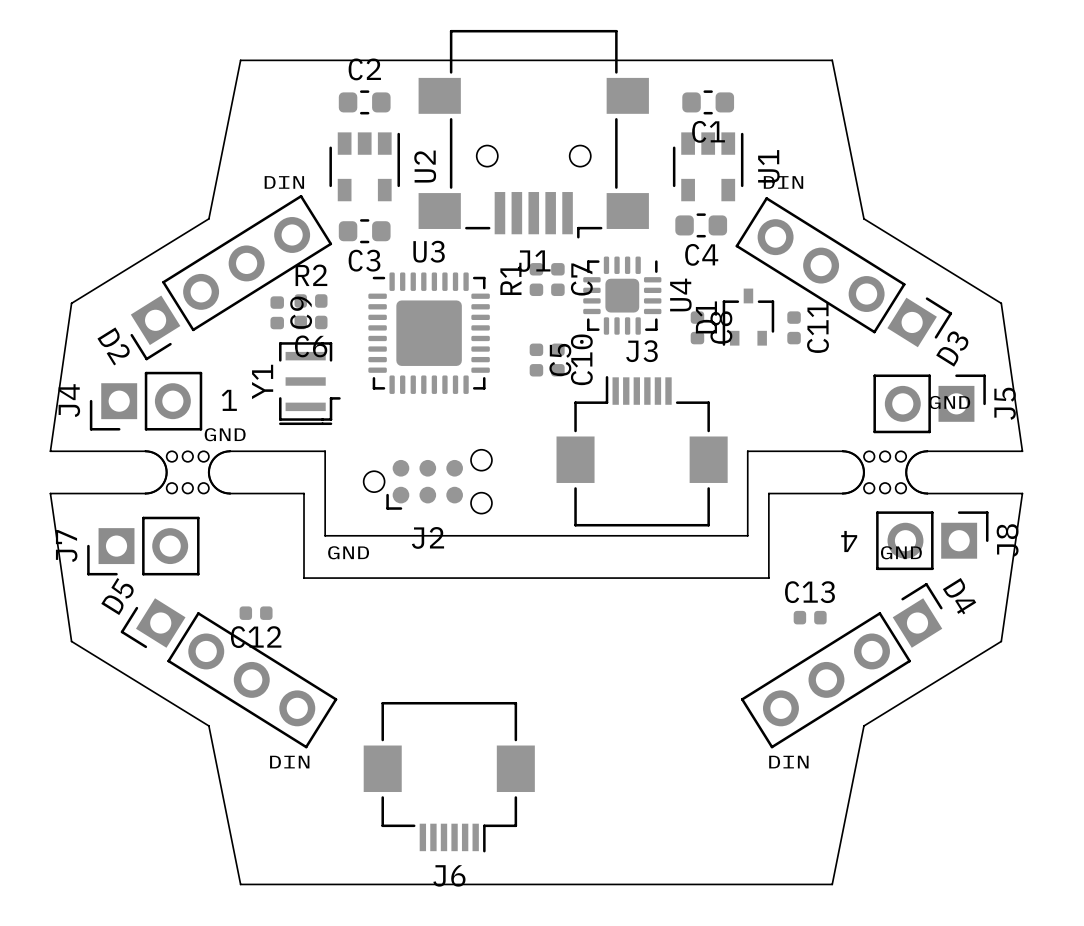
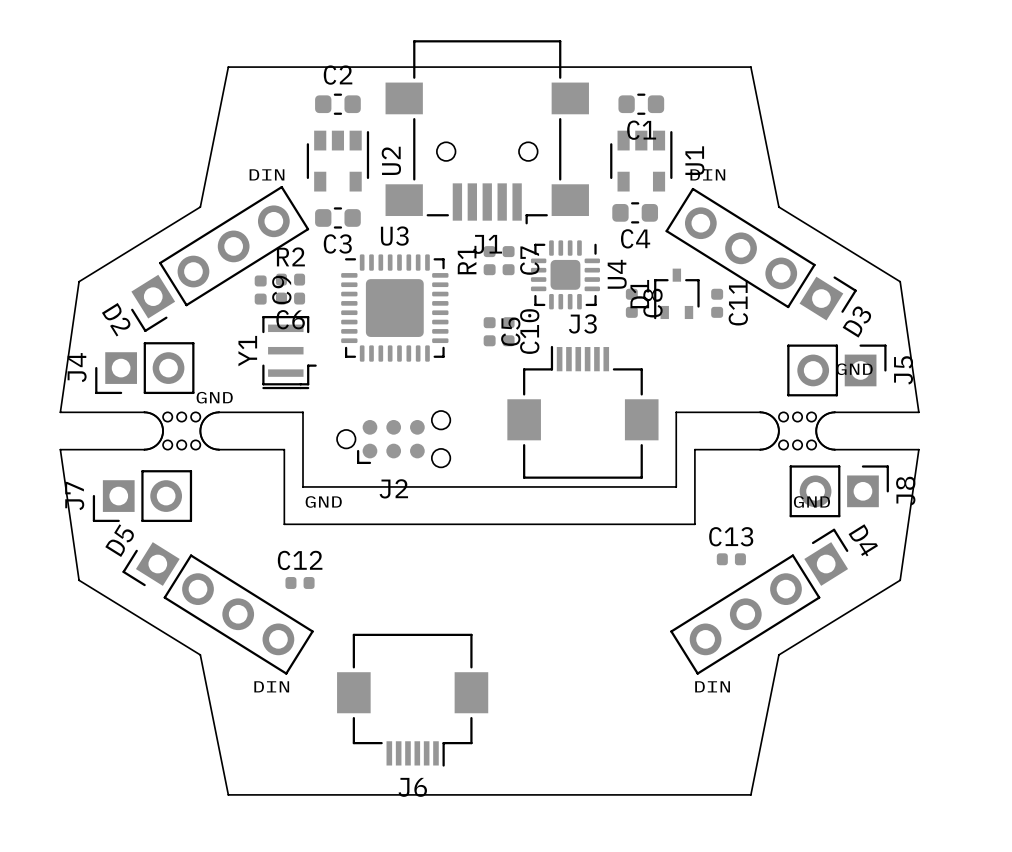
text: 1 (229, 400) -> none
text: 4 (849, 541) -> none
C12 position: (256, 613) -> (300, 582)
C12 name position: C12 (256, 637) -> C12 (300, 560)

